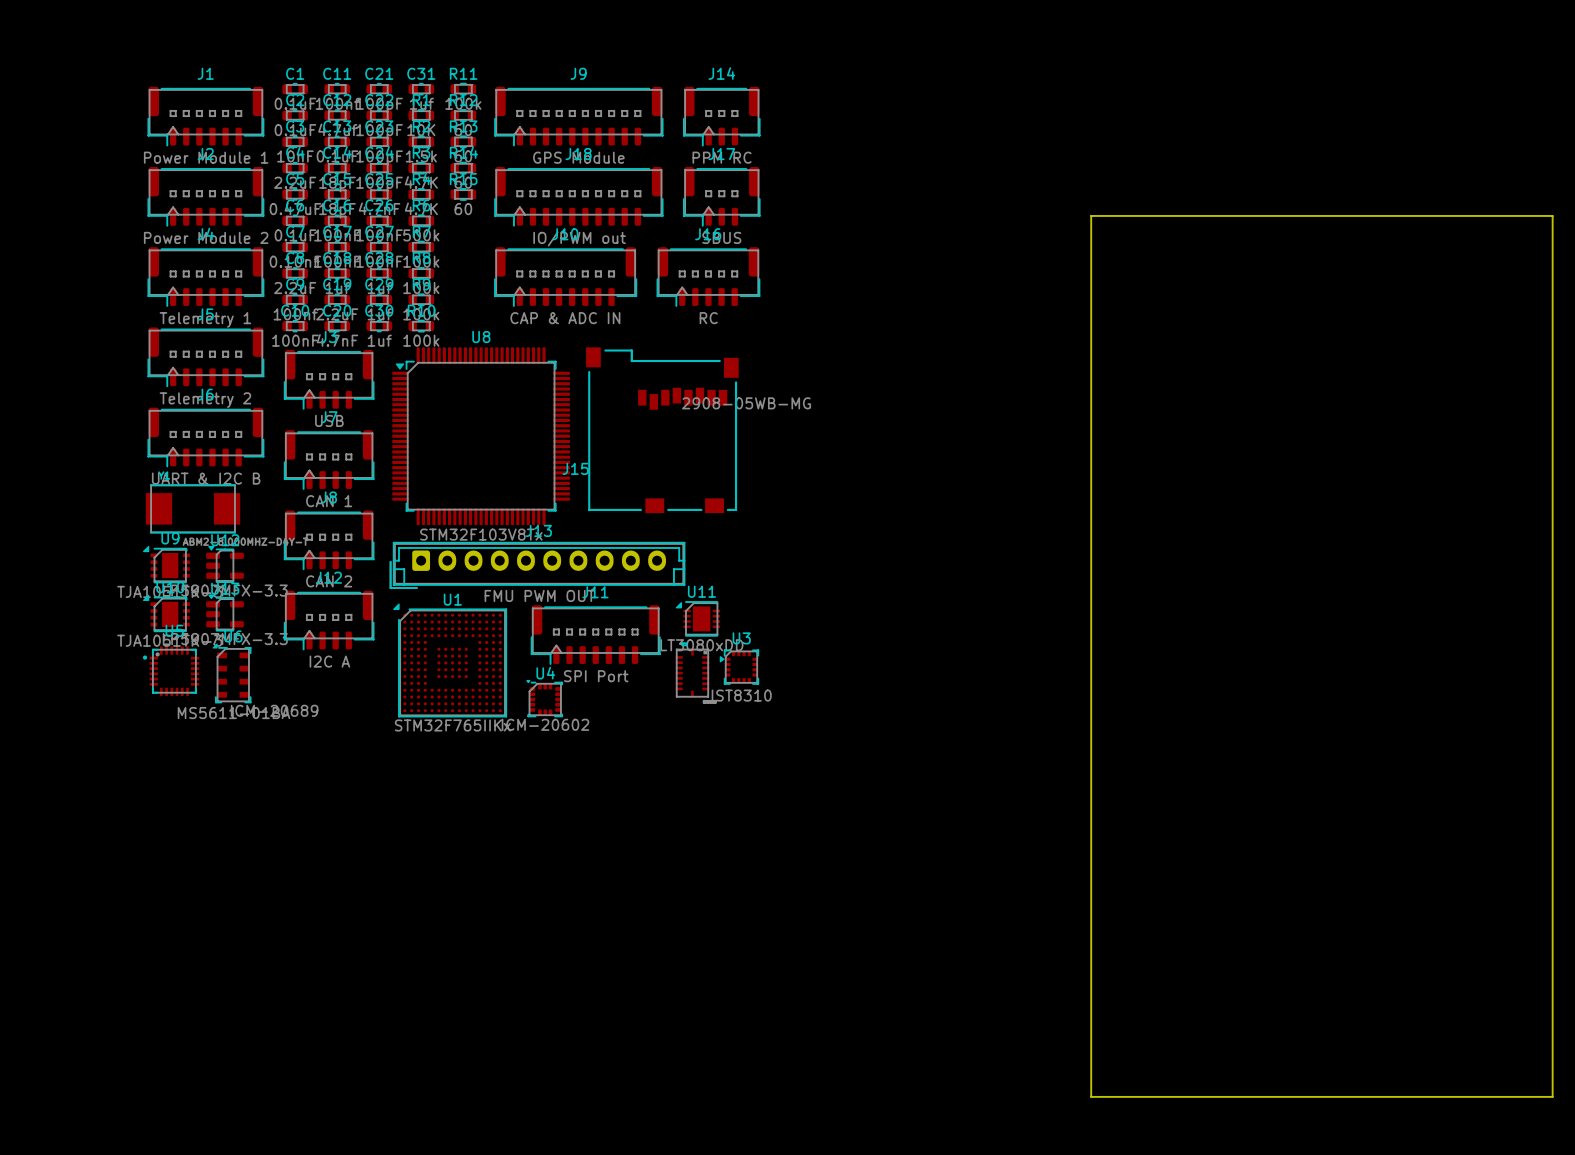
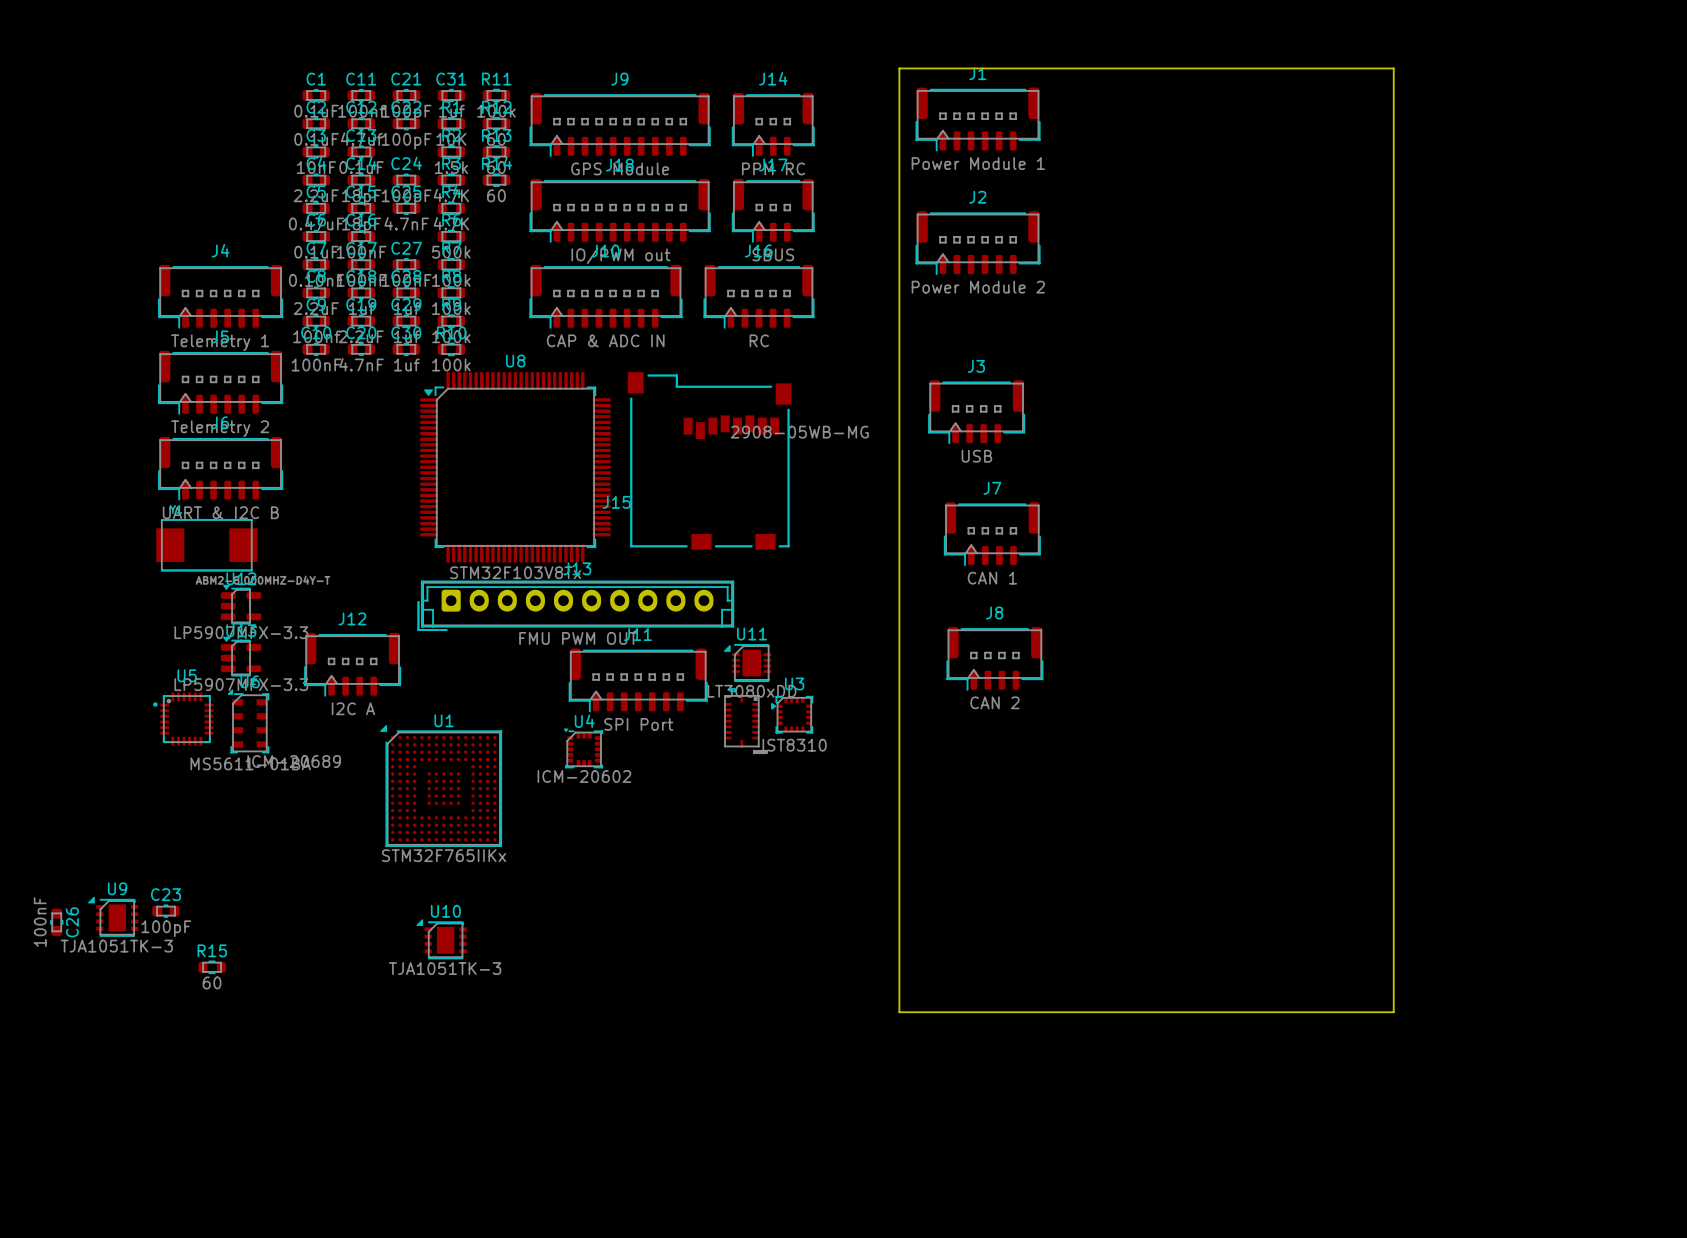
board edge: none -> (899, 68) (1393, 68) (1393, 1012) (899, 1012) (899, 68)
J1 position: (205, 116) -> (978, 119)
C23 position: (379, 141) -> (166, 911)
R15 position: (463, 194) -> (212, 967)
J2 position: (205, 196) -> (978, 242)
board edge: (1091, 215) (1552, 215) (1552, 1096) (1091, 1096) (1091, 215) -> none
C26 rotation: 0° (379, 220) -> 90° clockwise (56, 922)
C26 position: (379, 220) -> (56, 922)
J3 position: (329, 379) -> (976, 412)
J7 position: (329, 459) -> (992, 533)
J8 position: (329, 540) -> (994, 658)
U9 position: (166, 564) -> (113, 916)
U10 position: (166, 613) -> (441, 939)
U1 position: (449, 660) -> (440, 785)

